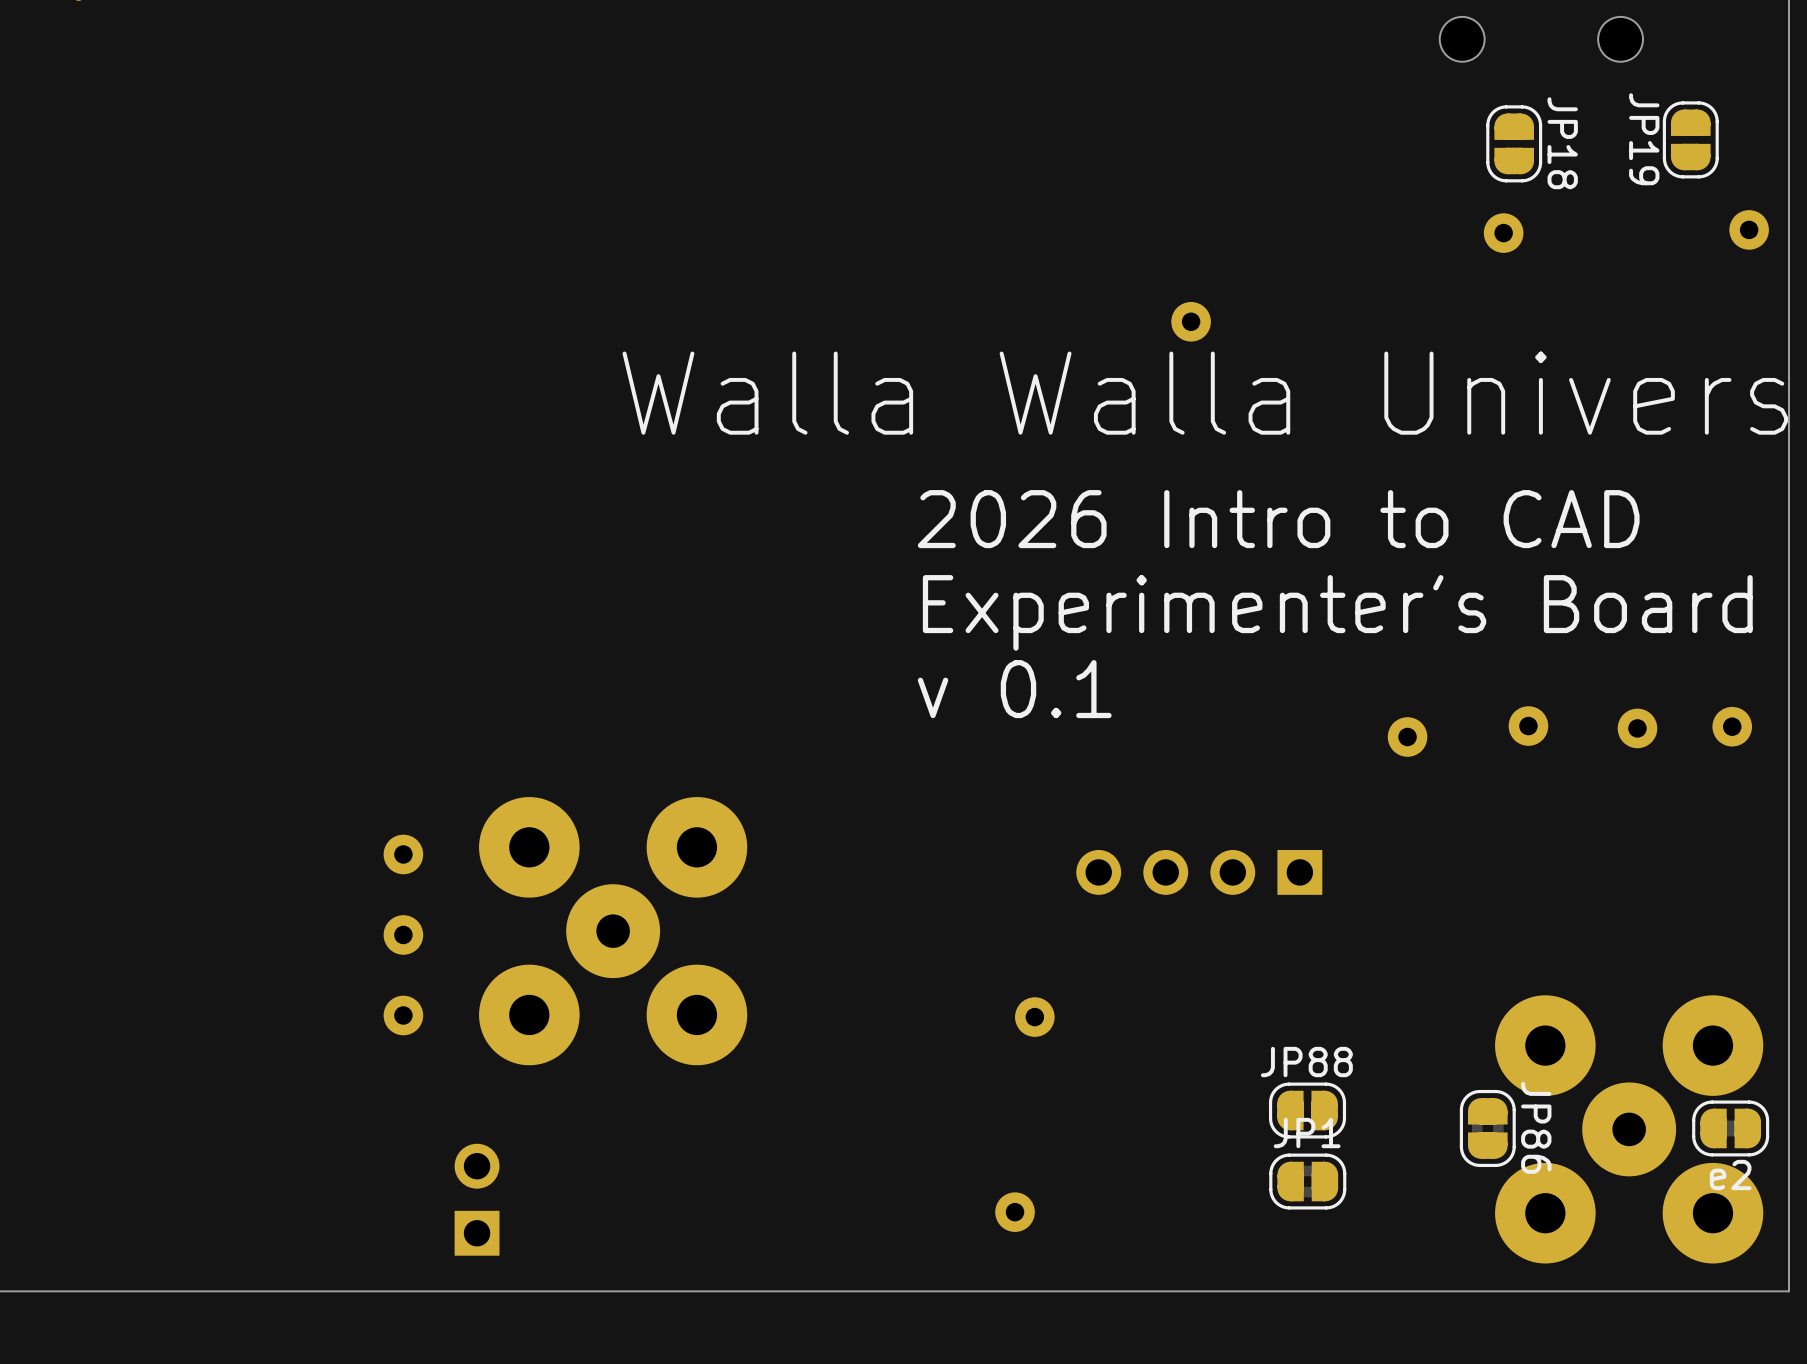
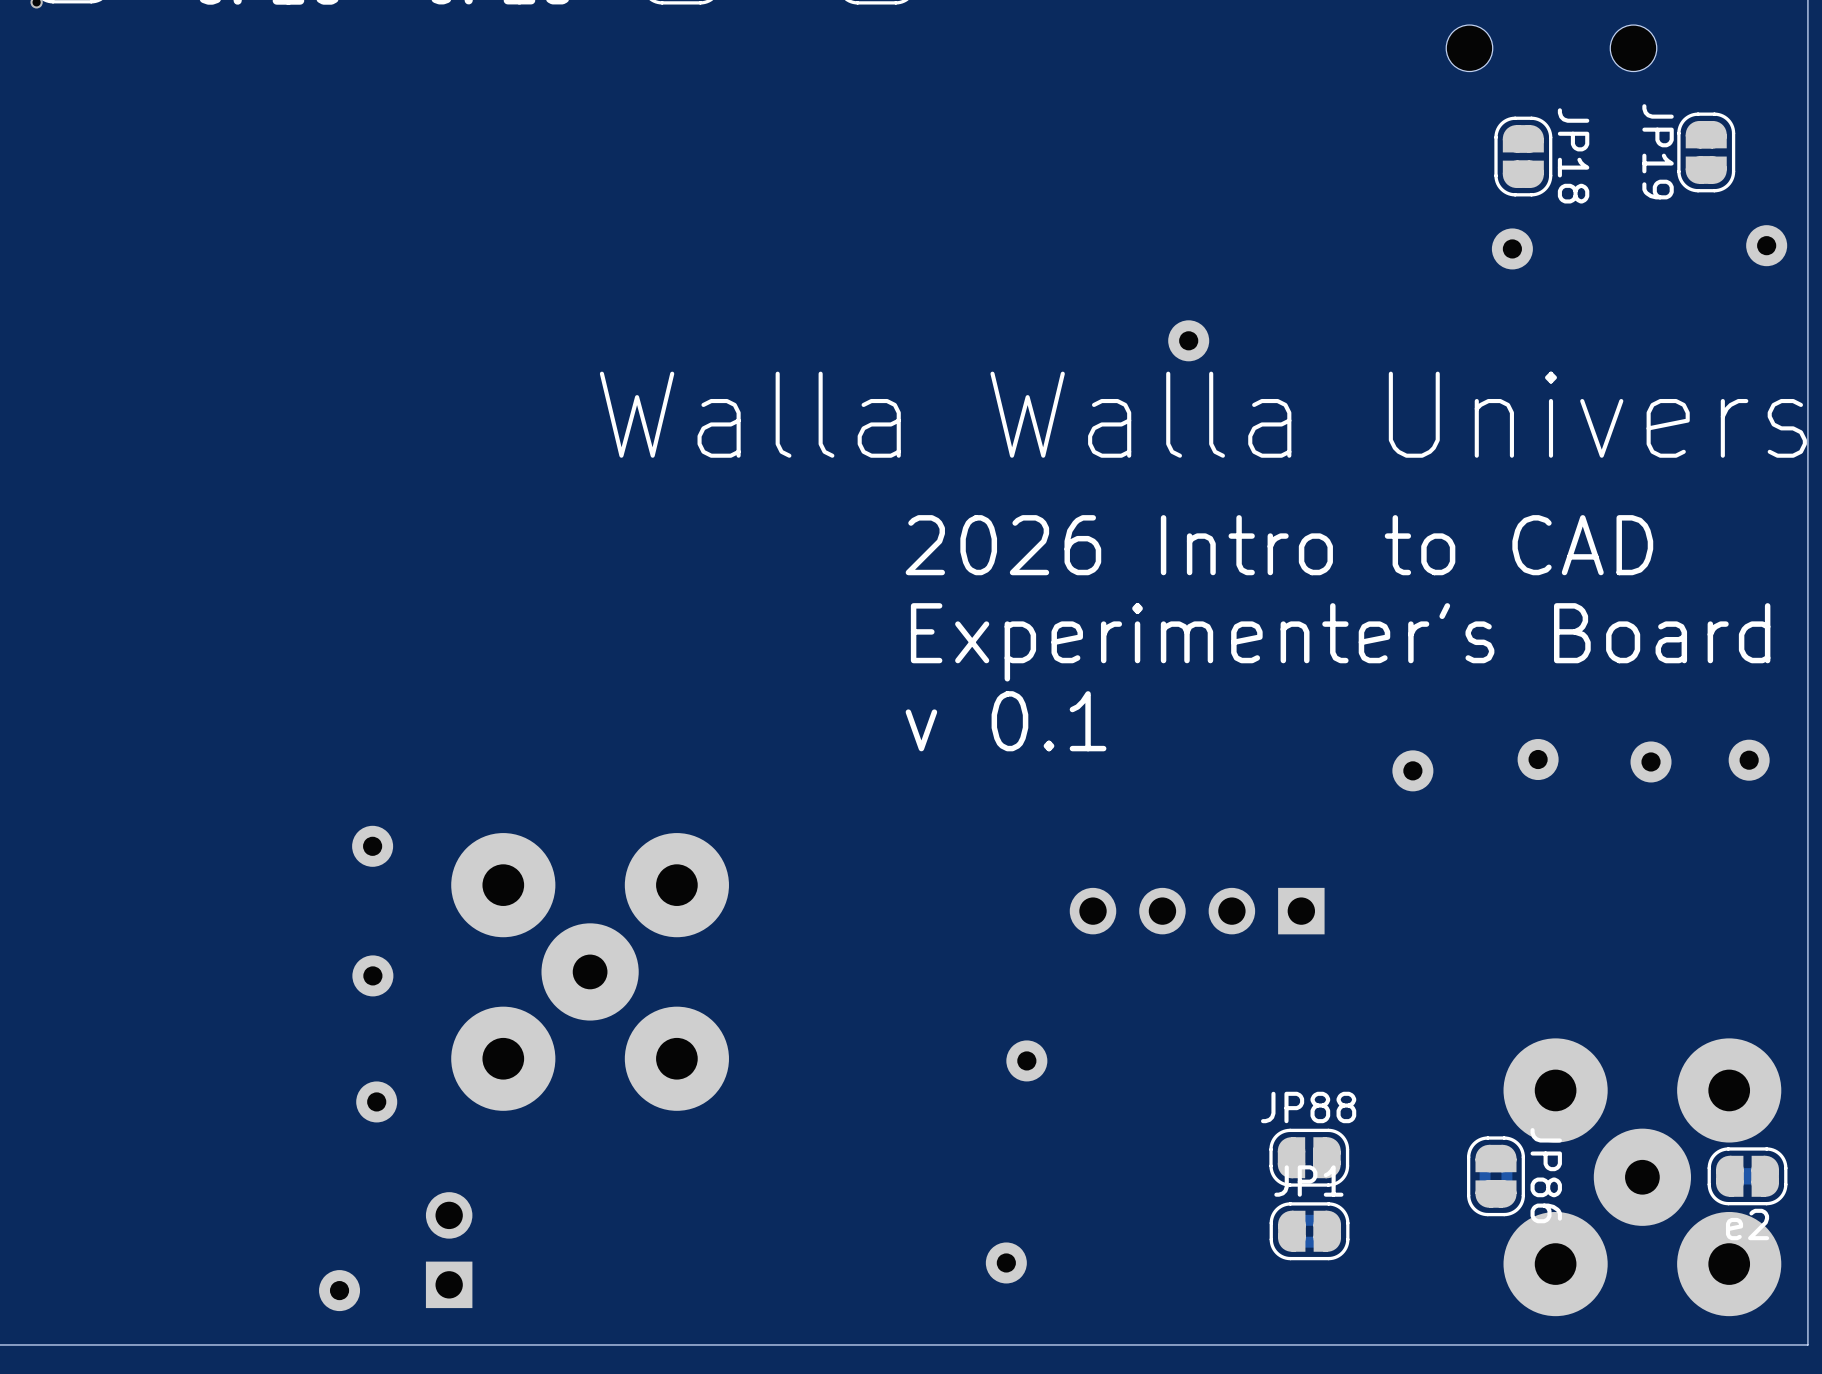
part position: (403, 854) -> (372, 846)
part position: (403, 1015) -> (376, 1101)
part: none -> (339, 1290)

